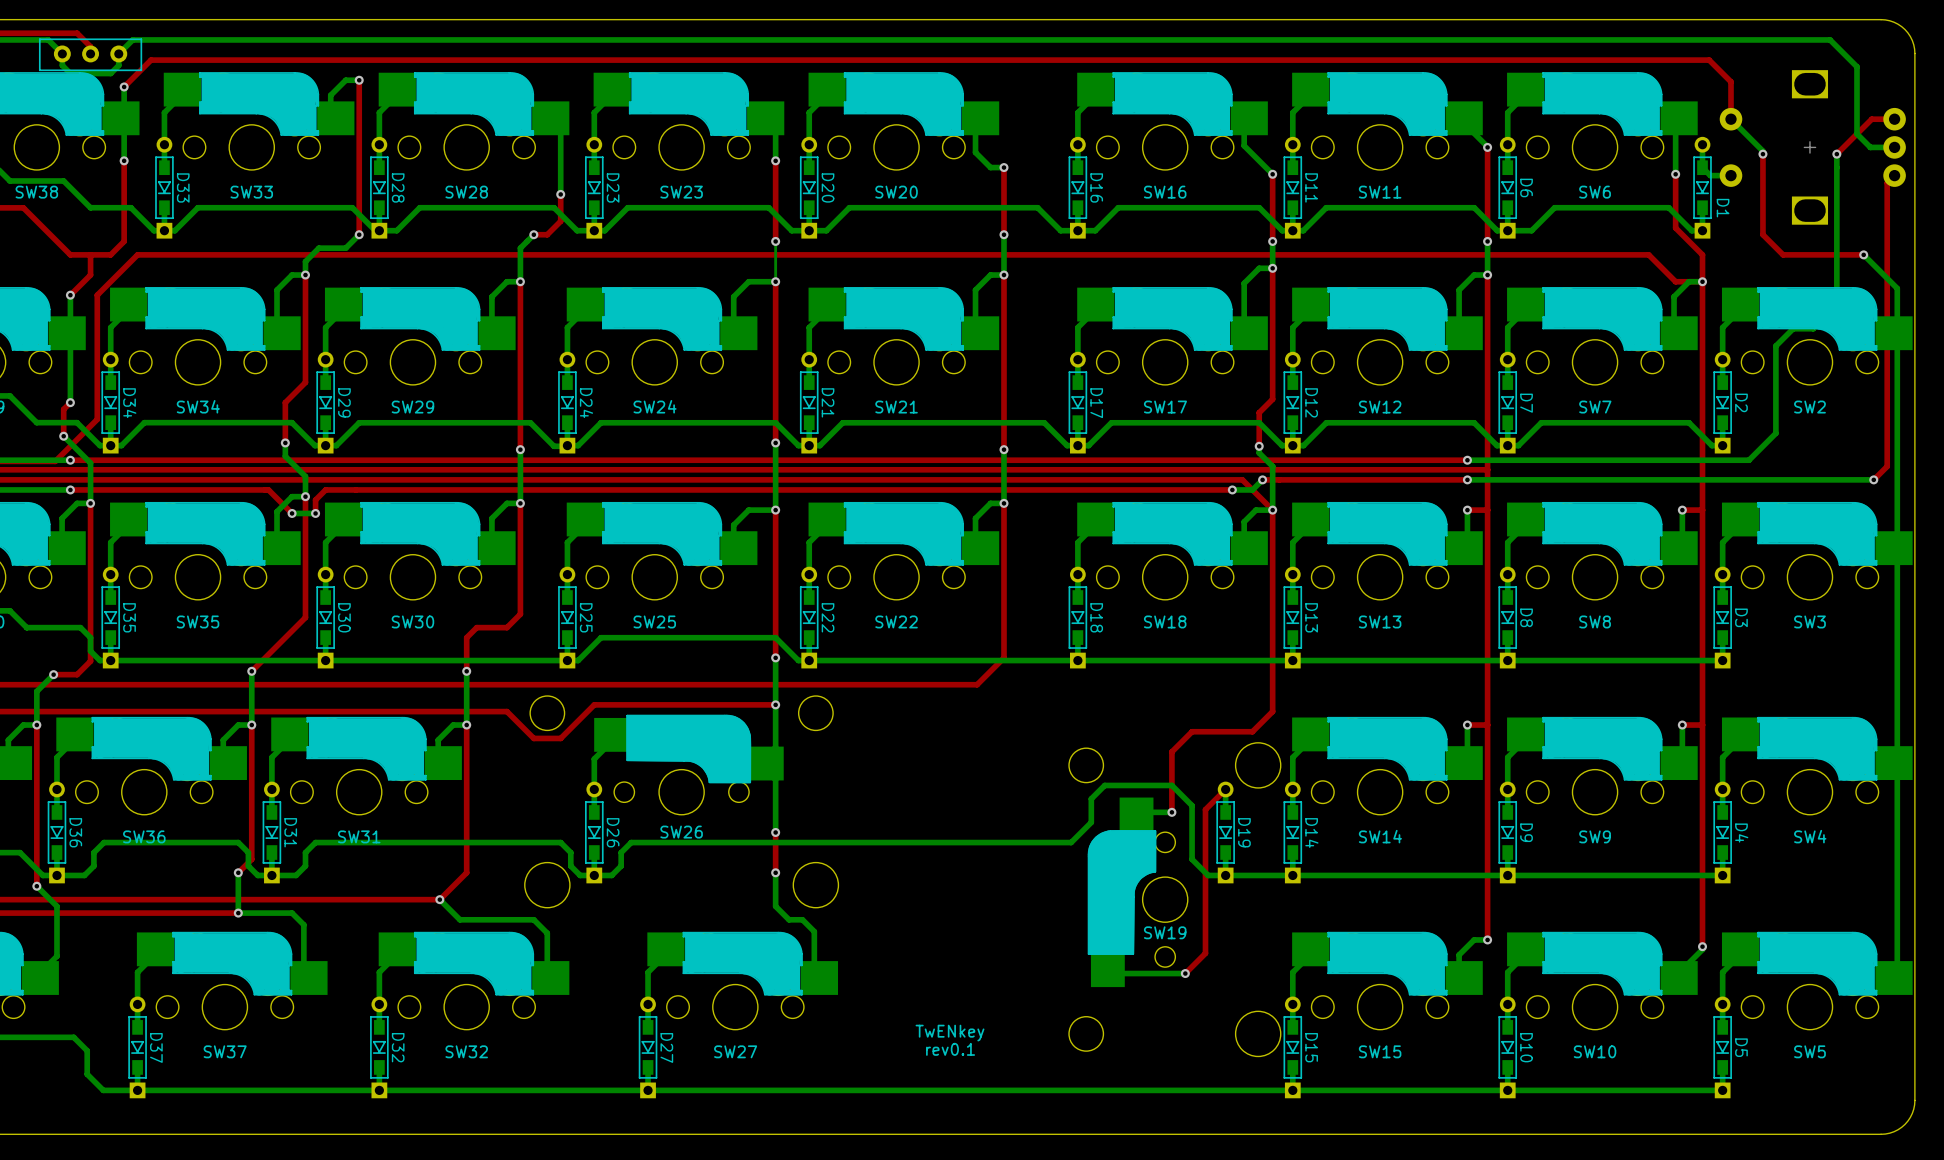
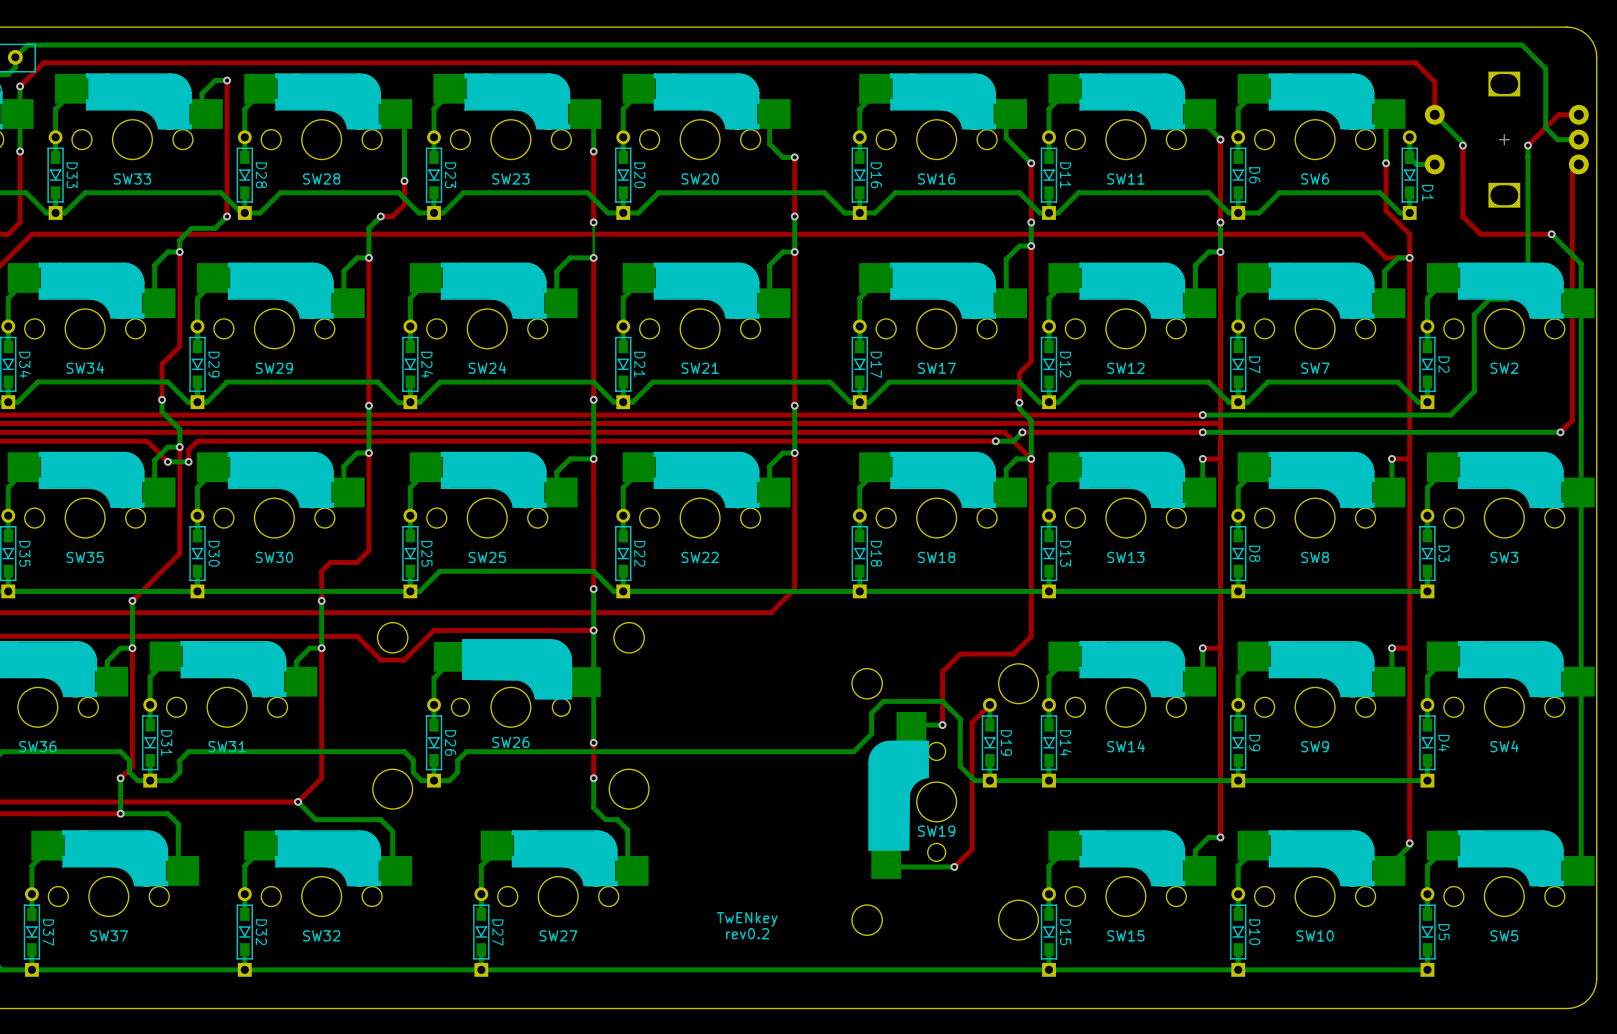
text: rev0.1 (950, 1049) -> rev0.2 (747, 933)

